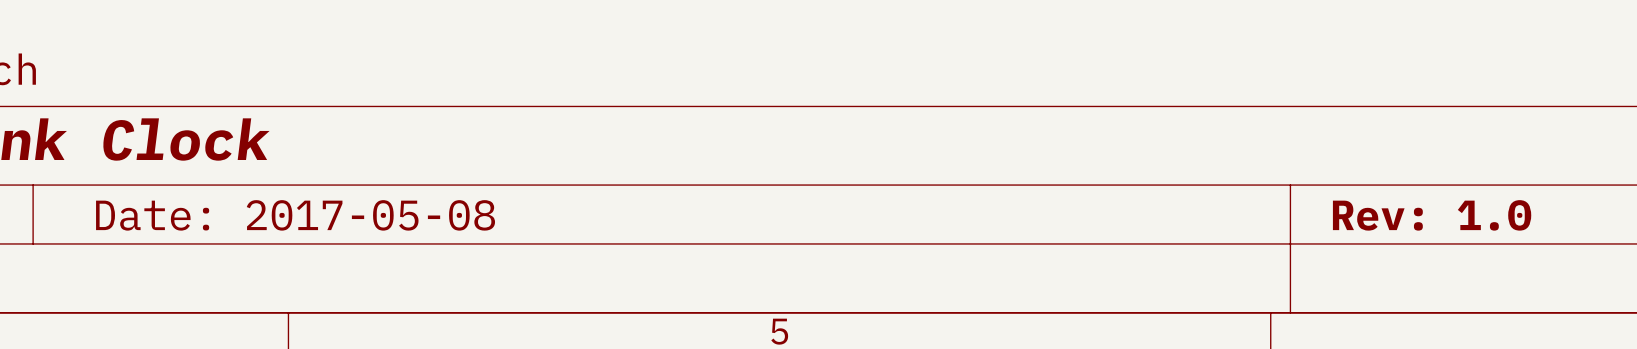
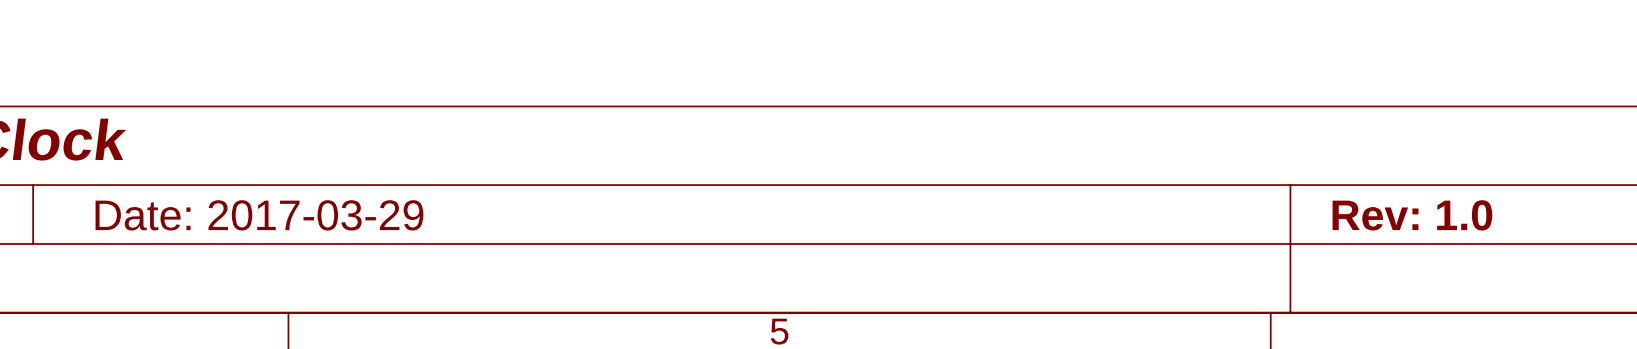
title block: Date: 2017-05-08 (295, 215) -> Date: 2017-03-29 (259, 215)

